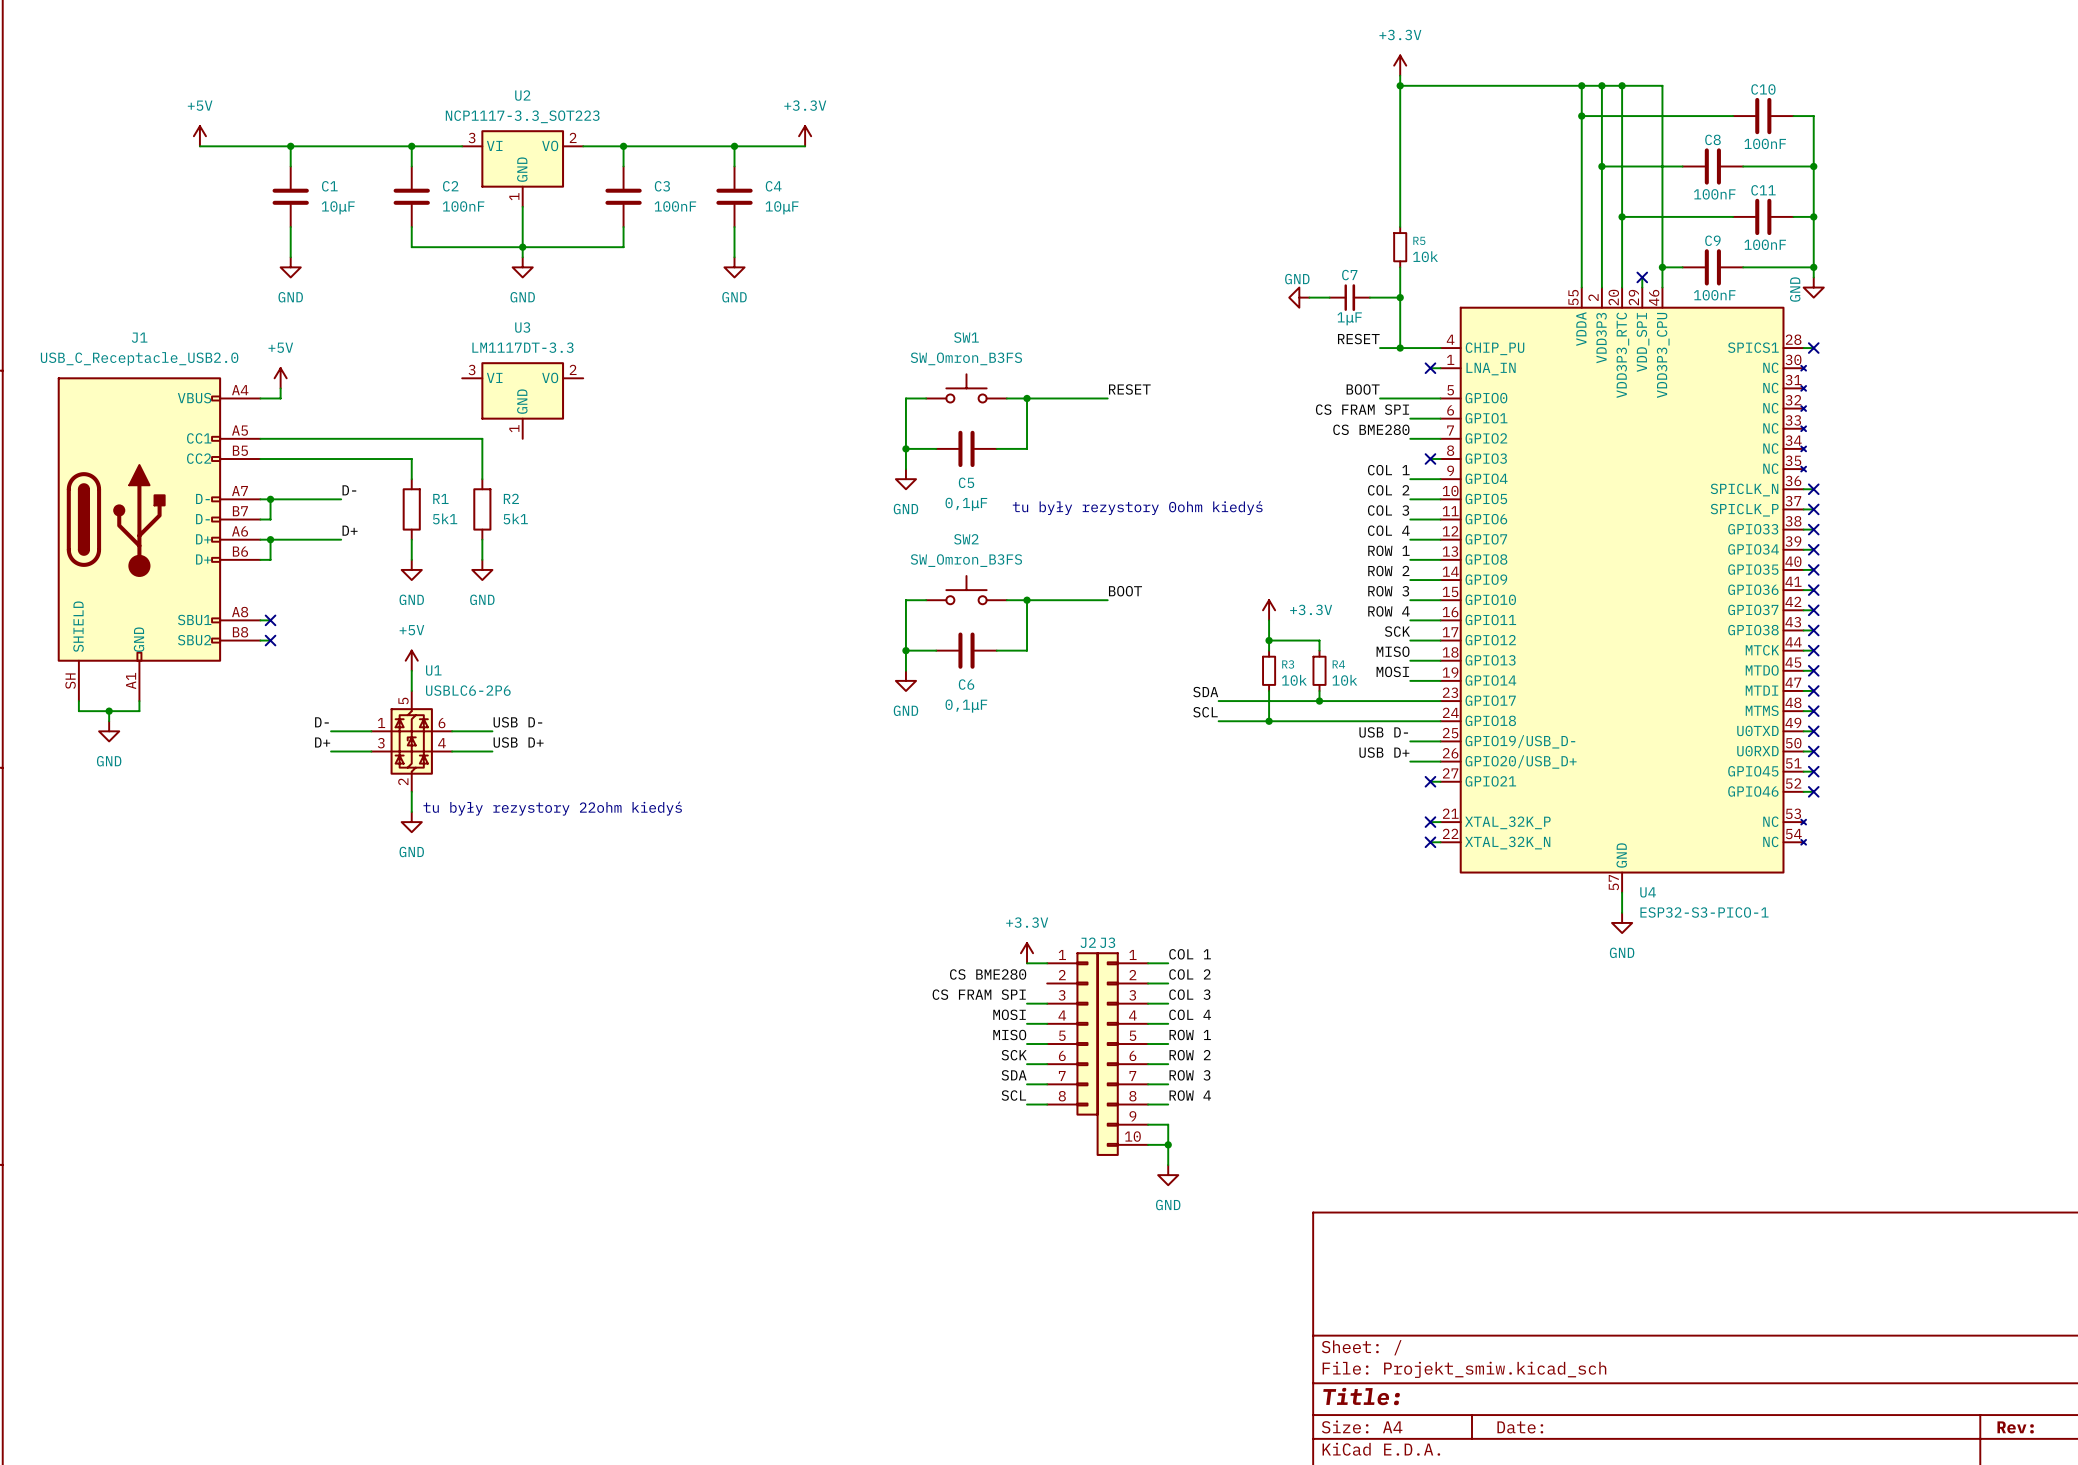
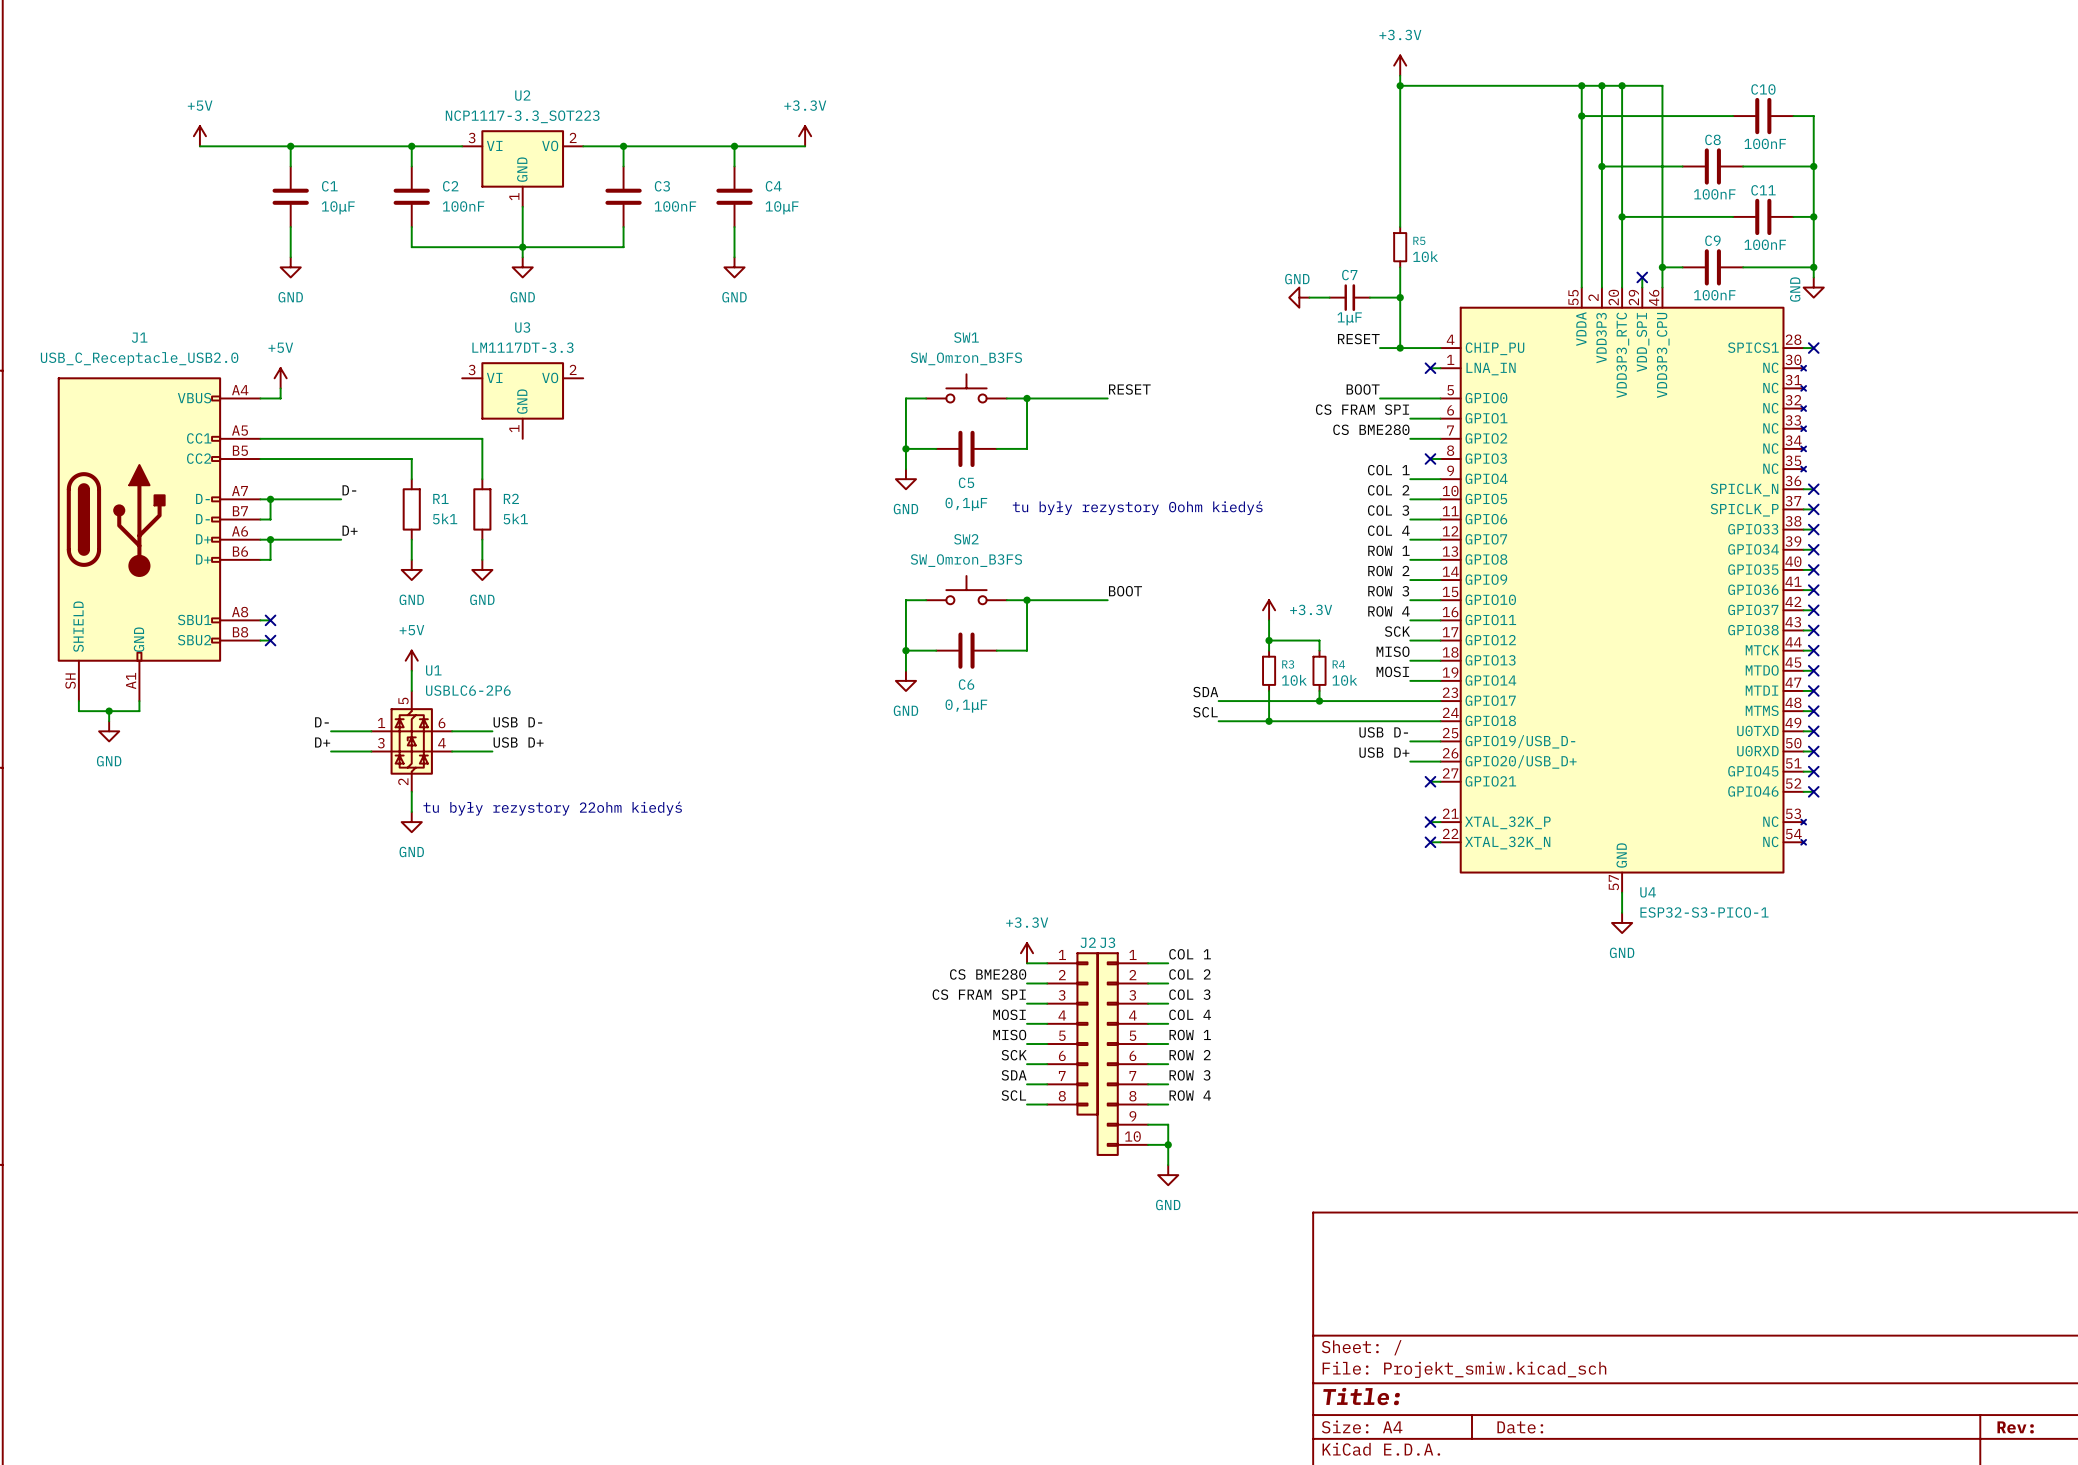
wire: none -> (1027, 983) (1047, 983)

